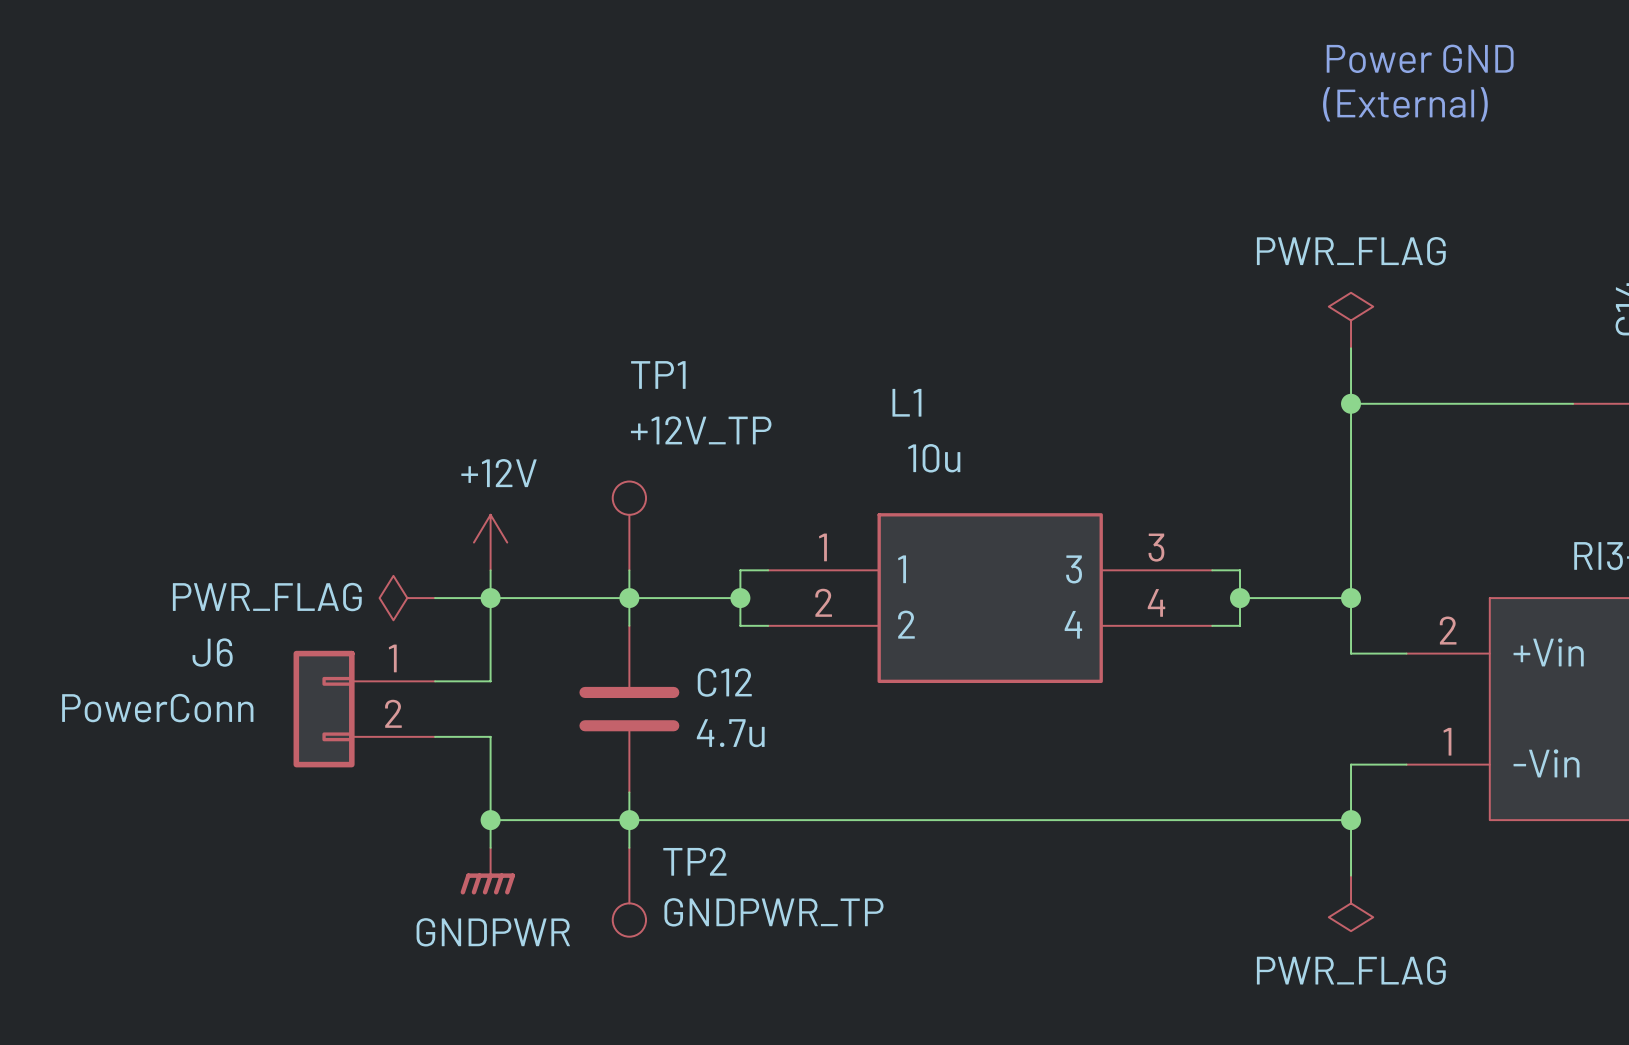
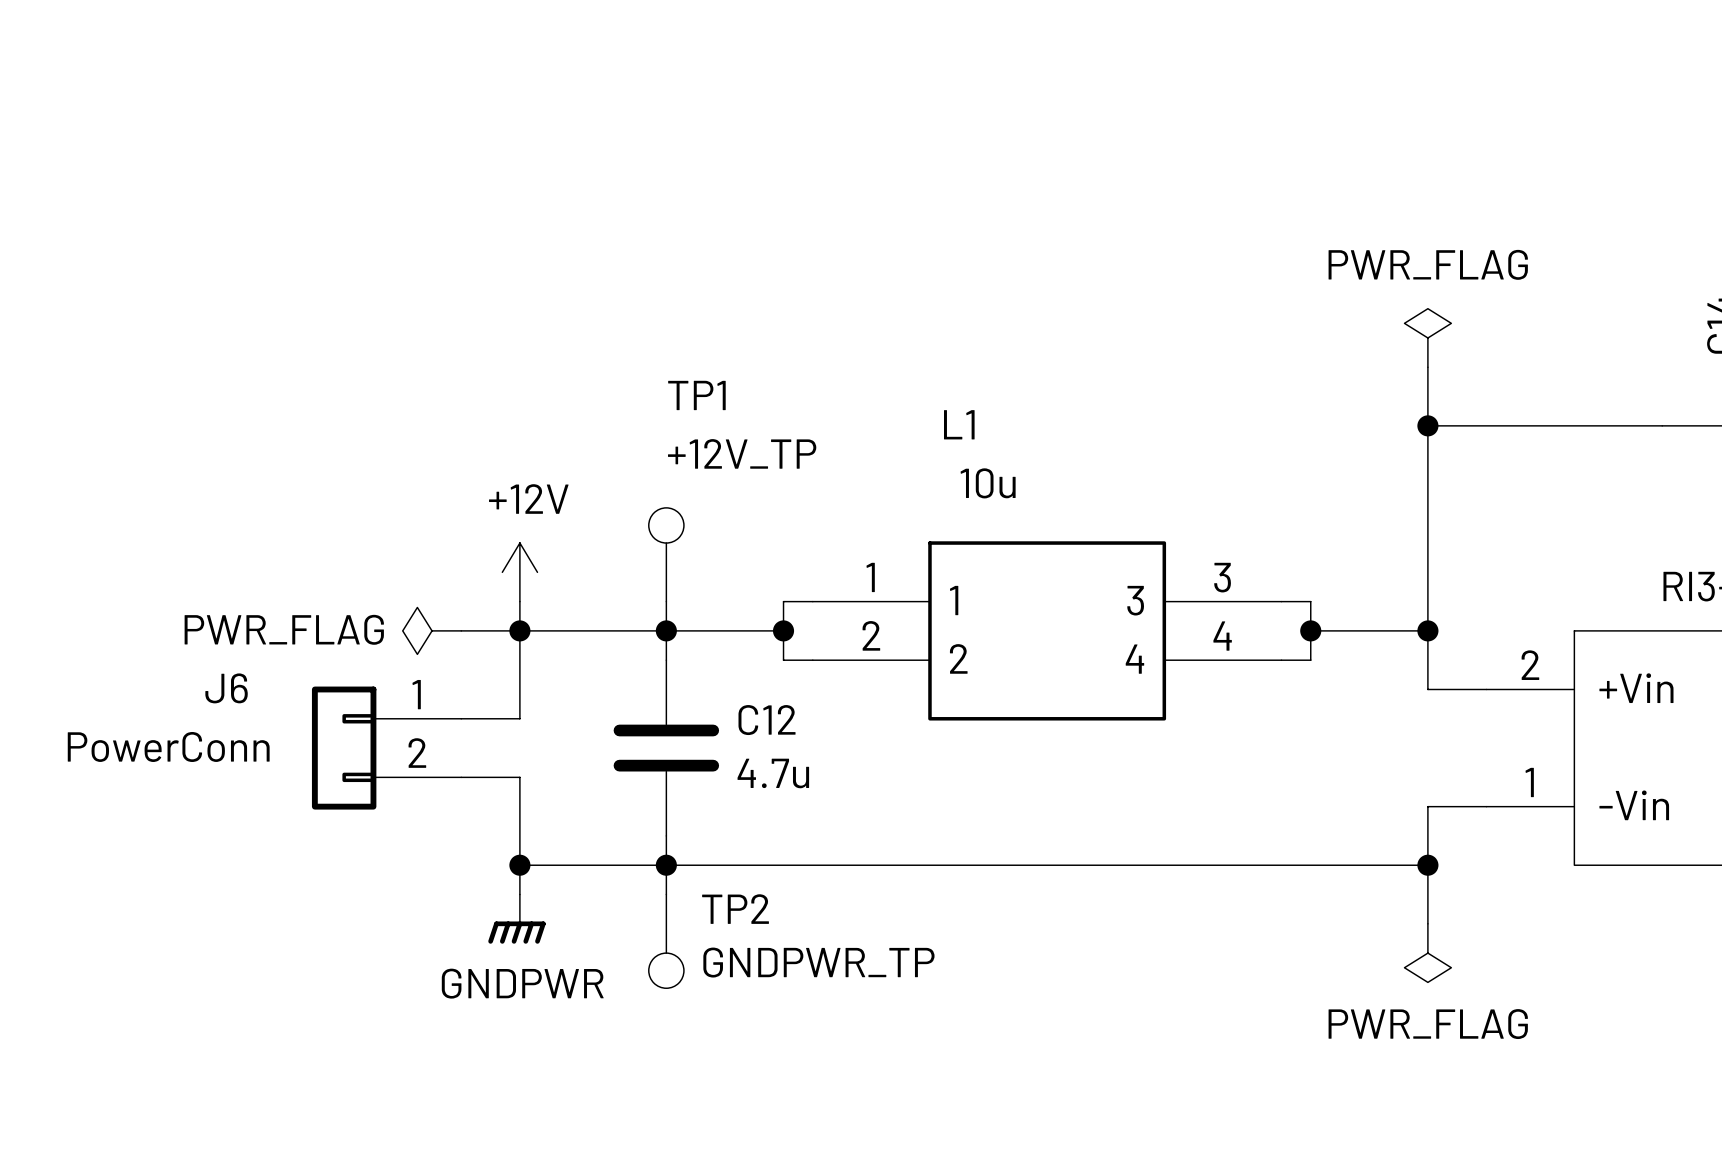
text: Power GND (1420, 58) -> none
text: (External) (1405, 104) -> none

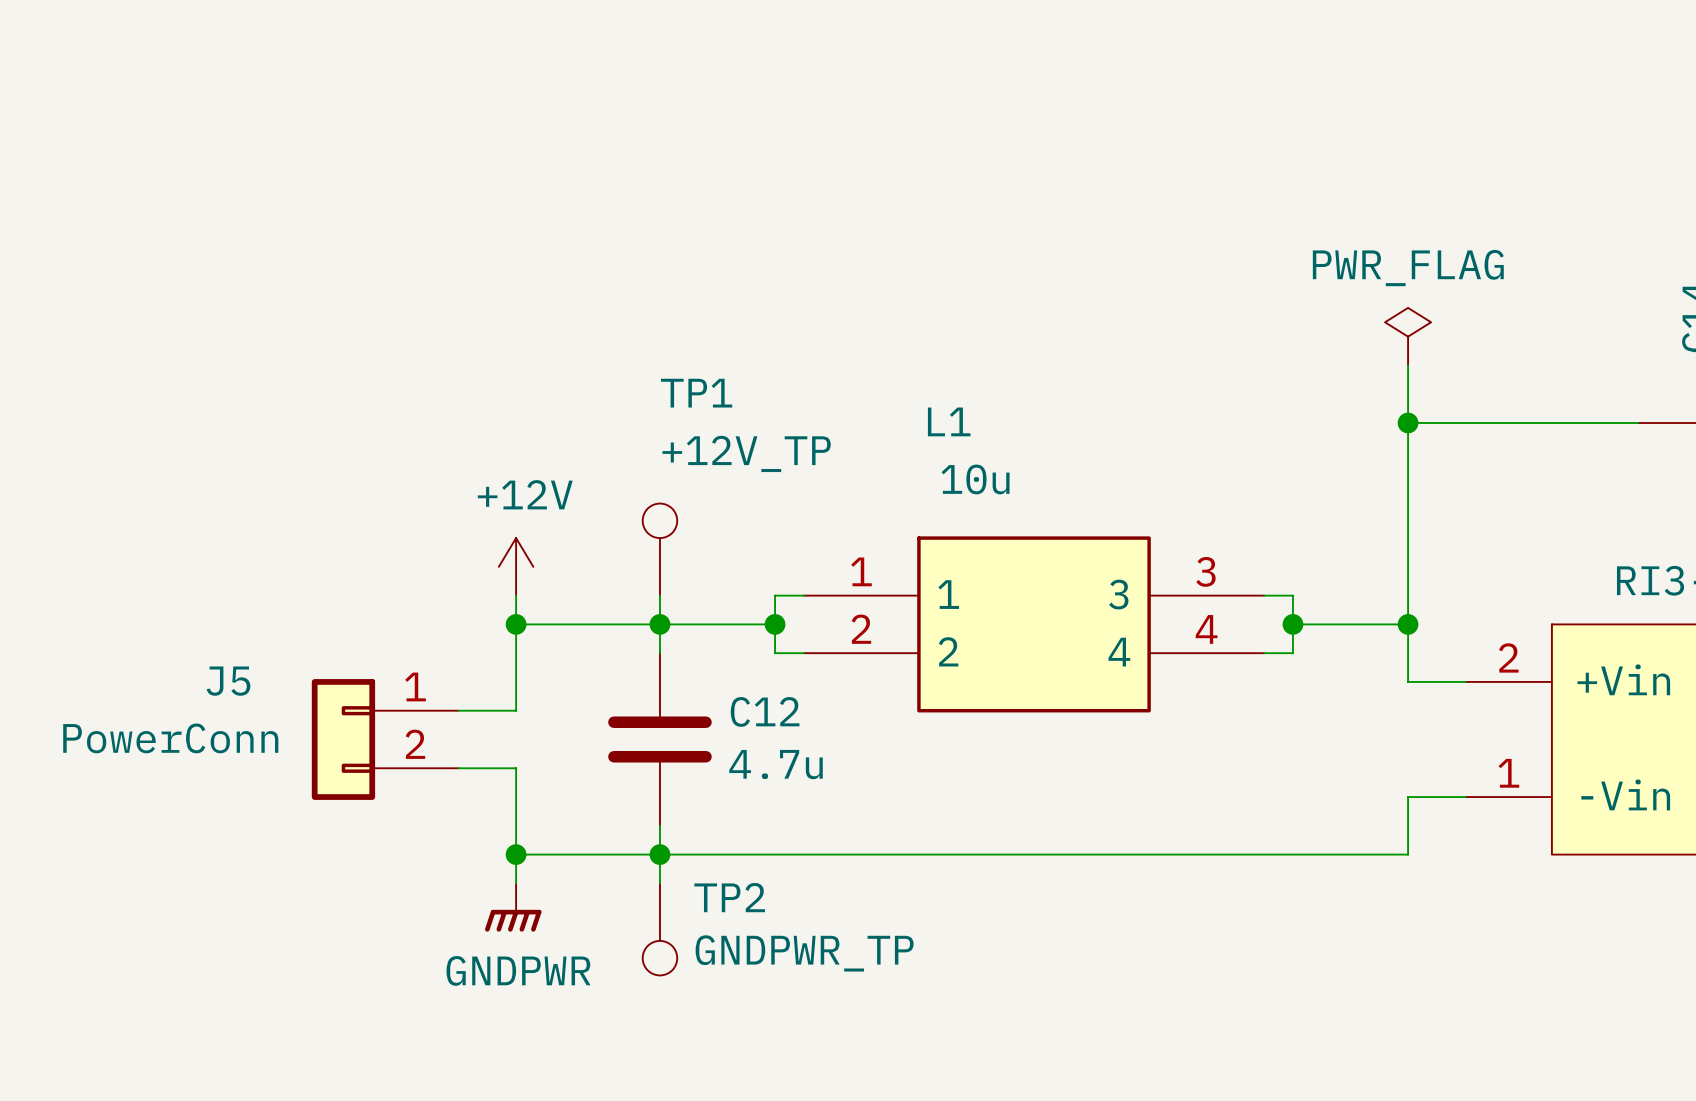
power symbol: PWR_FLAG (432, 630) -> none
wire: (461, 630) (519, 630) -> none
J6 name: J6 (226, 688) -> J5 (228, 681)
wire: (1427, 865) (1427, 923) -> none
junction: (1427, 865) -> none
power symbol: PWR_FLAG (1427, 953) -> none

